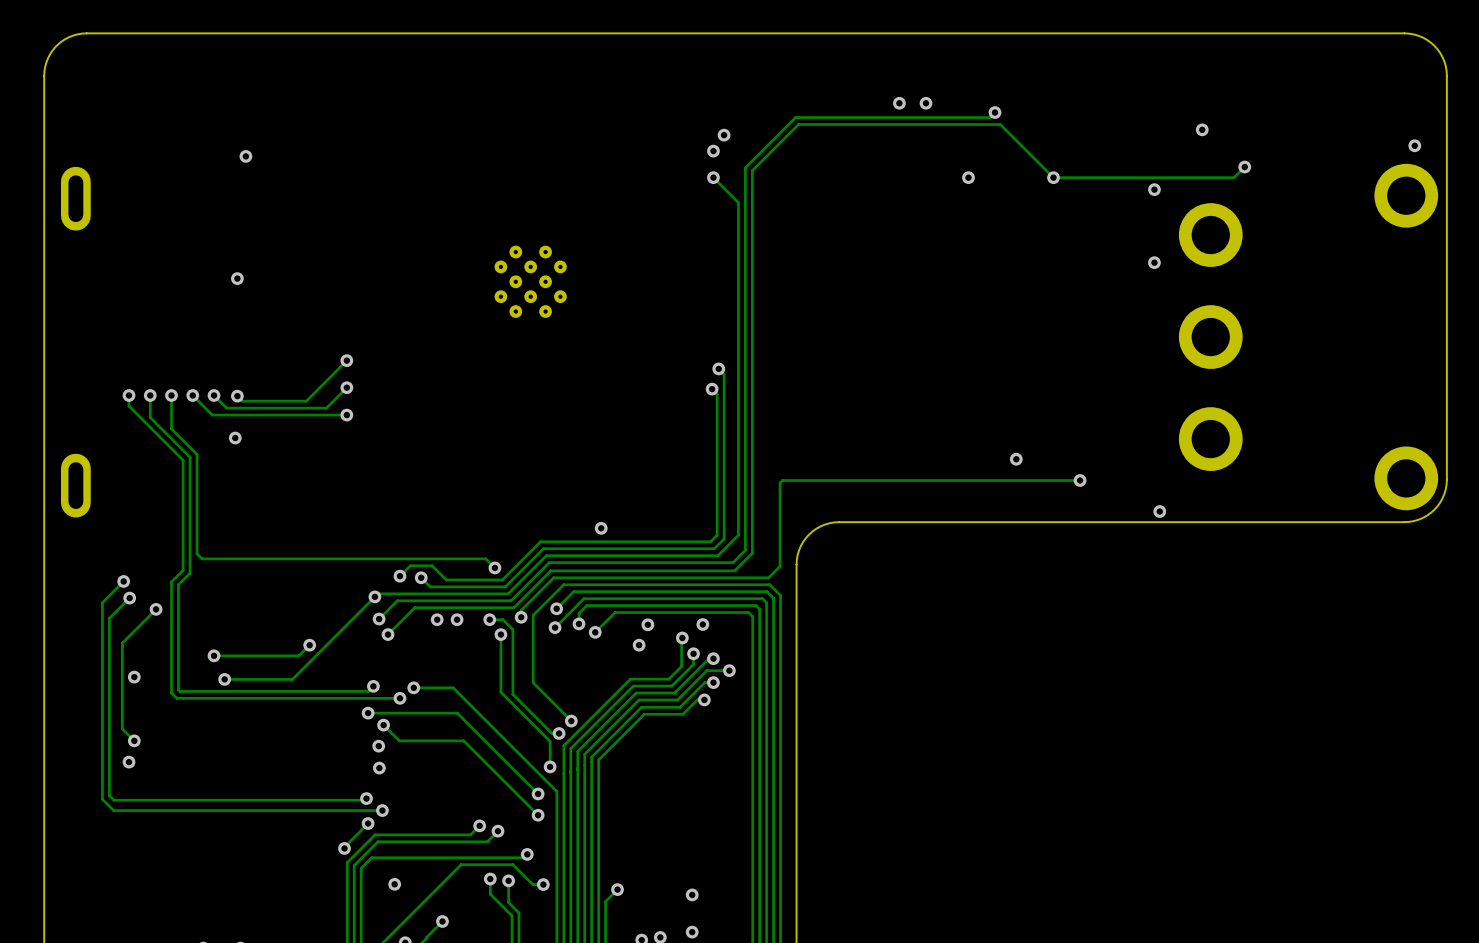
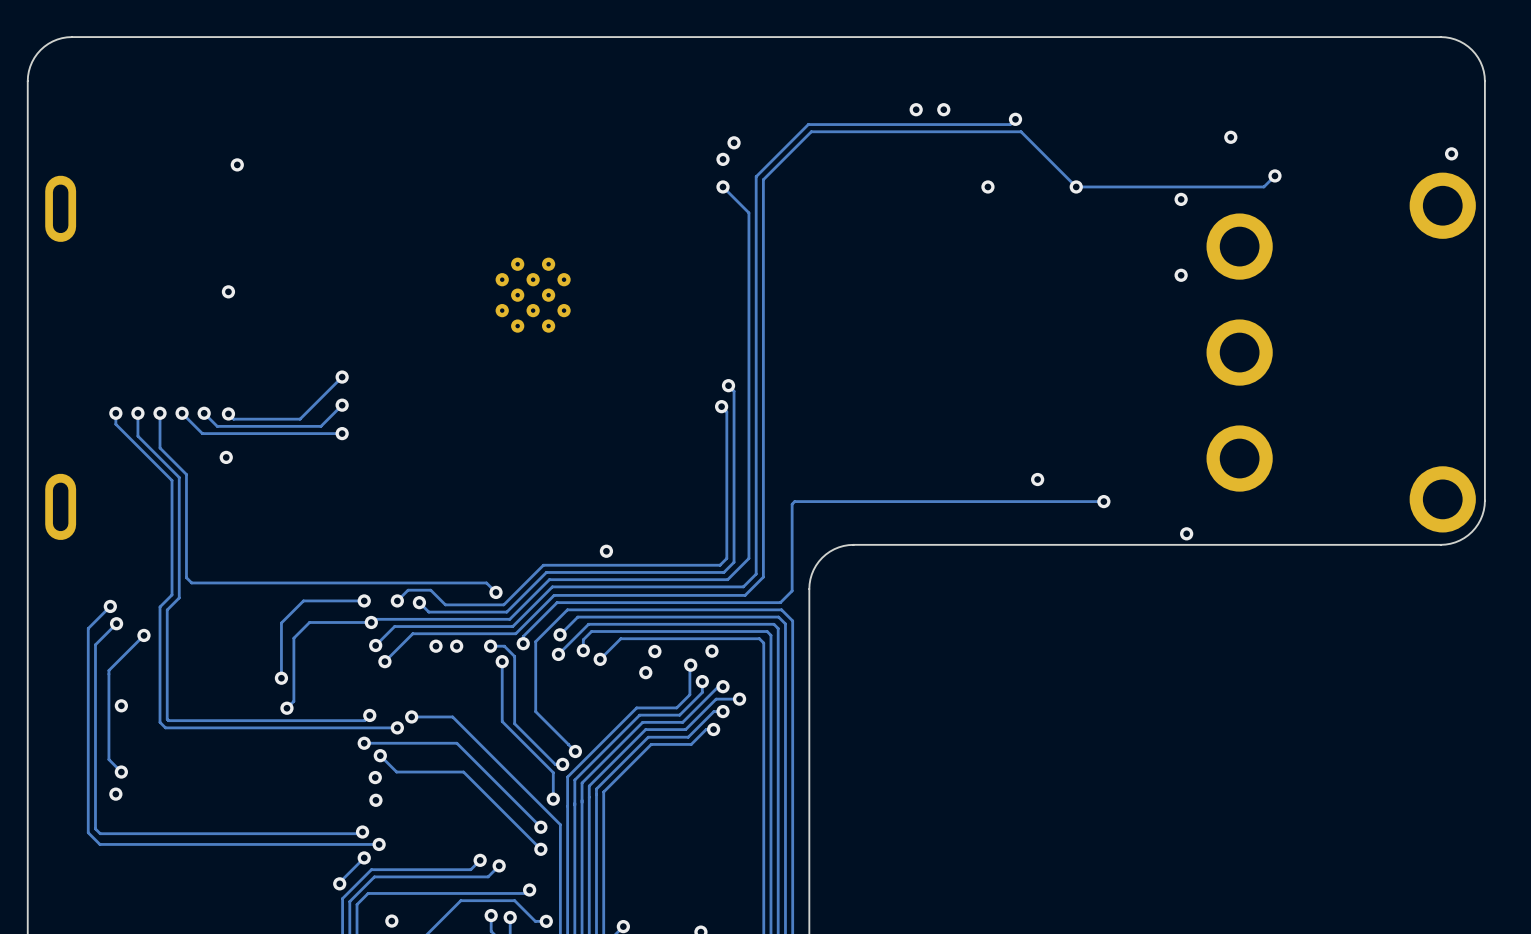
track: none -> (364, 600) (303, 600) (281, 623) (281, 678)
via: none -> (364, 600)
track: (374, 596) (292, 679) (224, 679) -> (371, 622) (309, 622) (293, 638) (293, 701) (286, 708)
track: (309, 645) (299, 655) (214, 655) -> none
via: (309, 645) -> none
via: none -> (281, 678)
via: (214, 655) -> none
via: (224, 679) -> none
via: none -> (286, 708)

